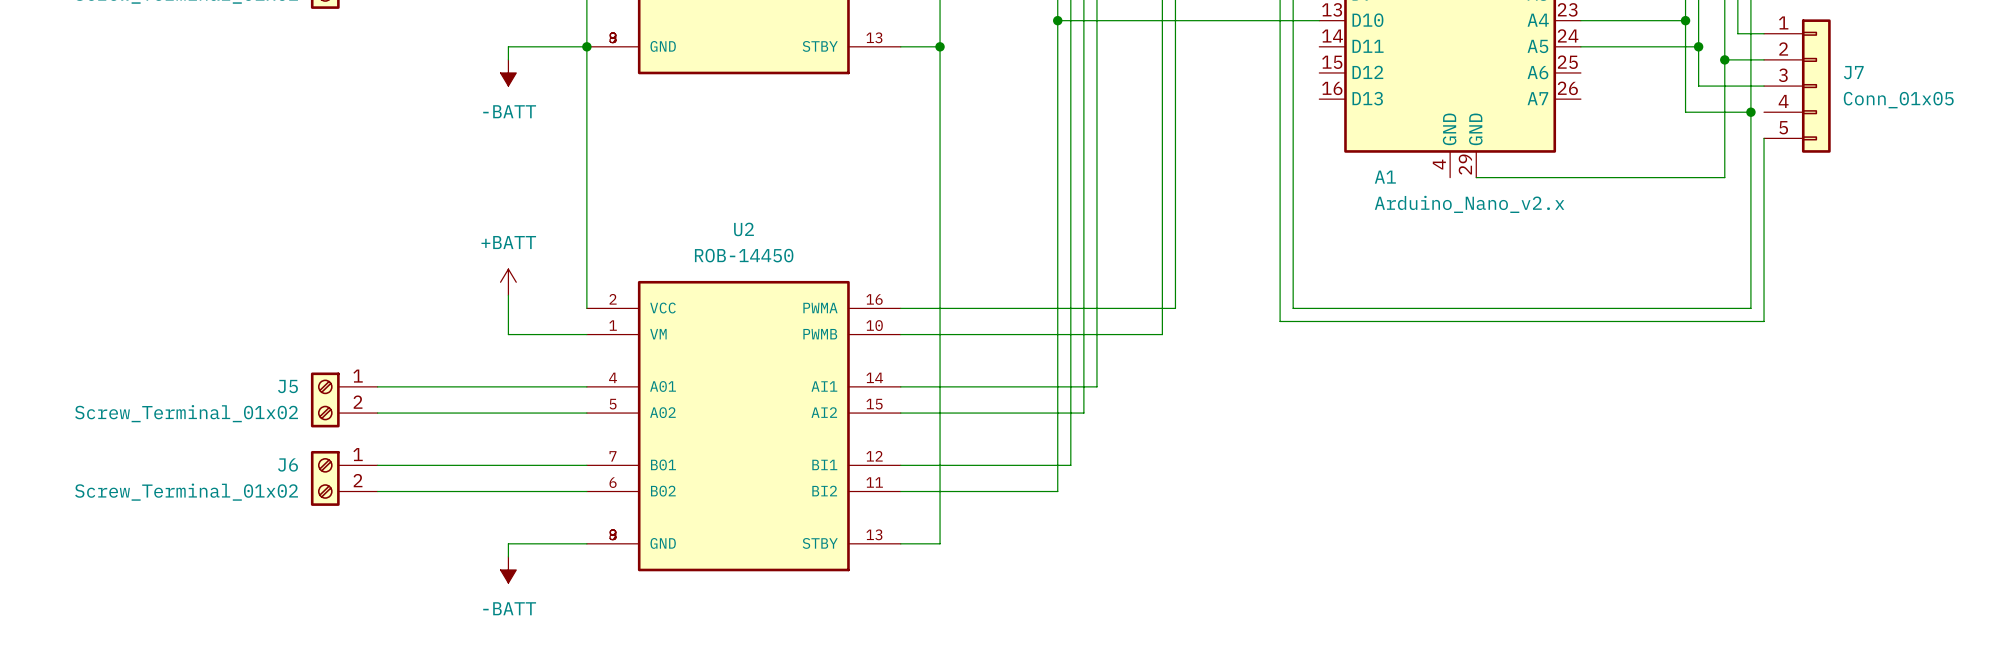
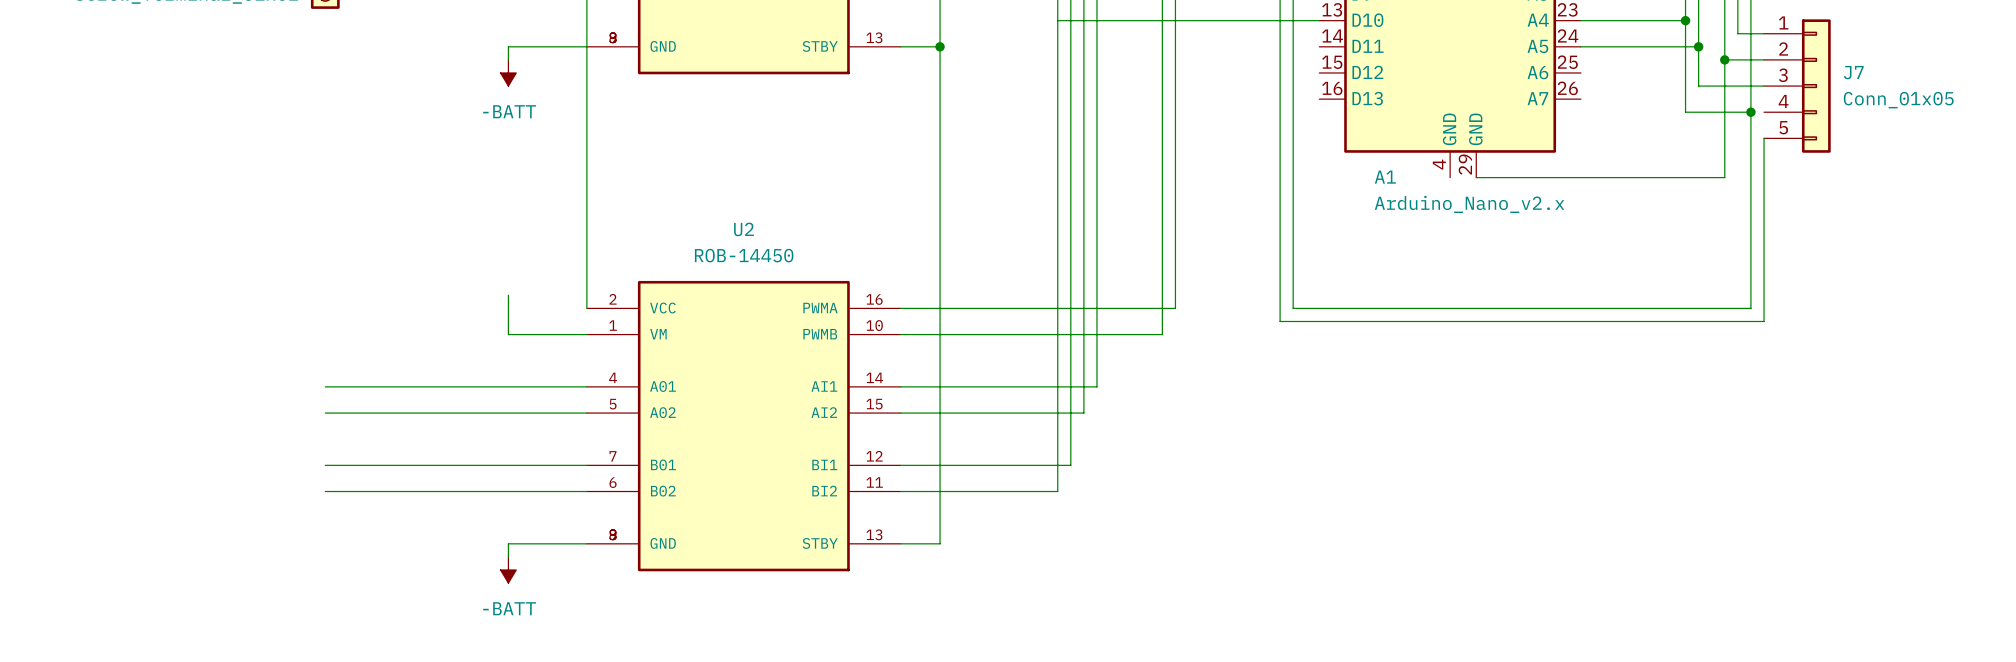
junction: (1057, 20) -> none
junction: (586, 46) -> none
power symbol: +BATT (508, 282) -> none
J5: Screw_Terminal_01x02 (344, 399) -> none
J6: Screw_Terminal_01x02 (344, 478) -> none

